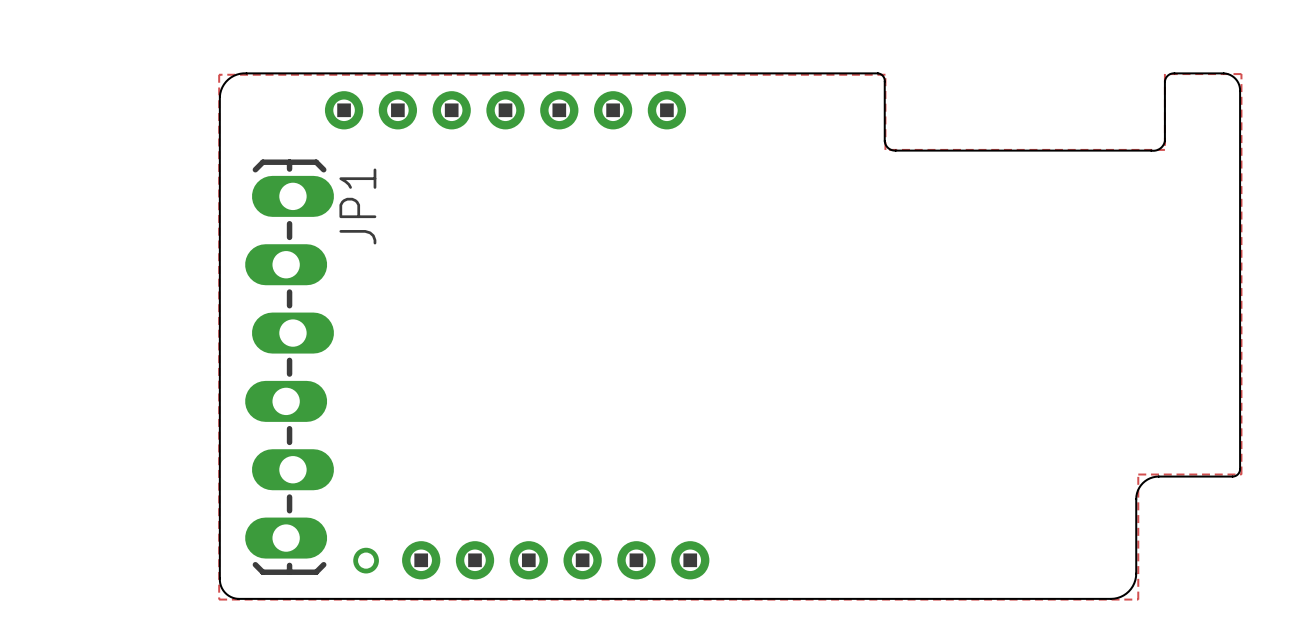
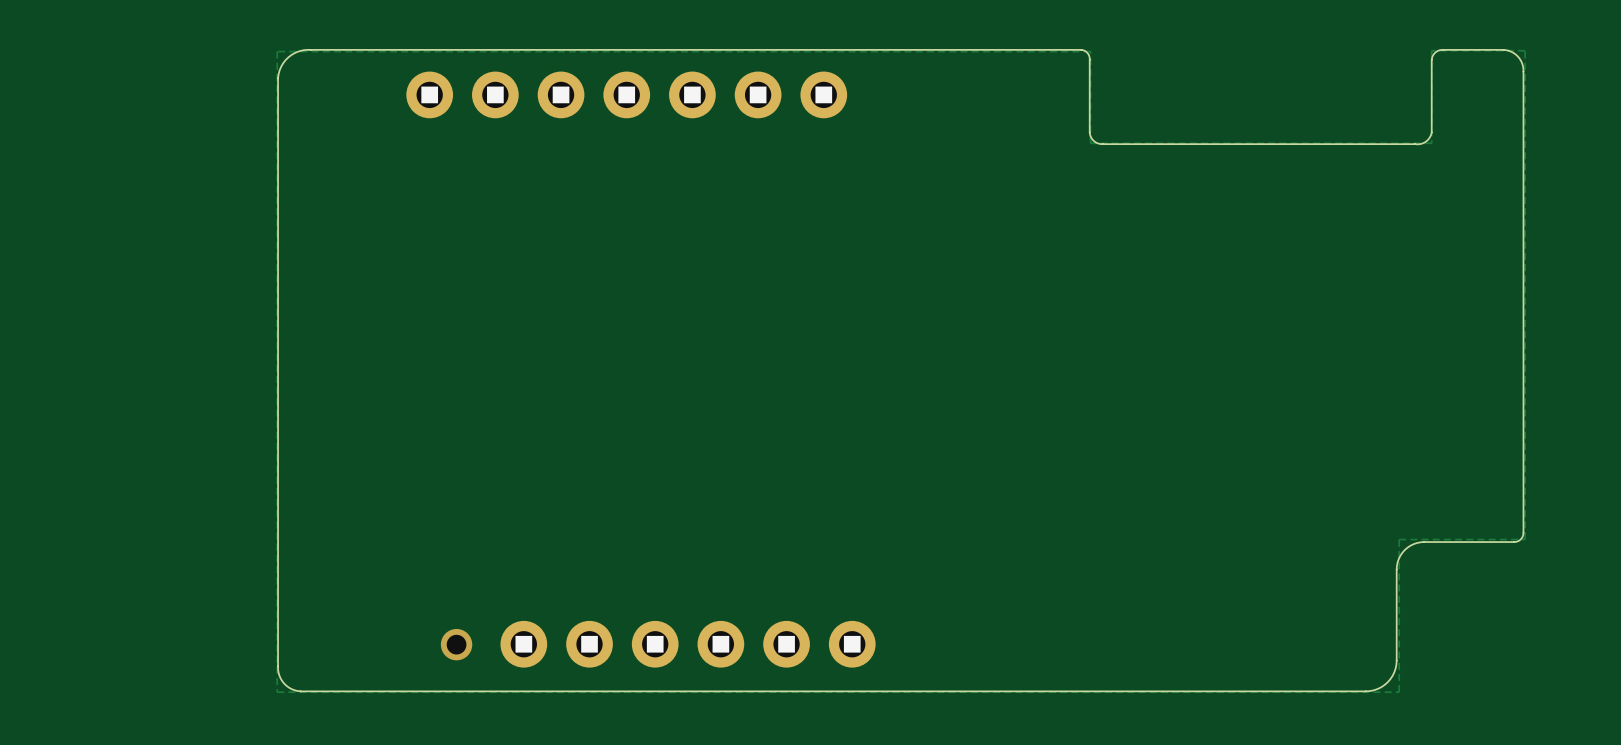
JP1: (289, 367) -> none

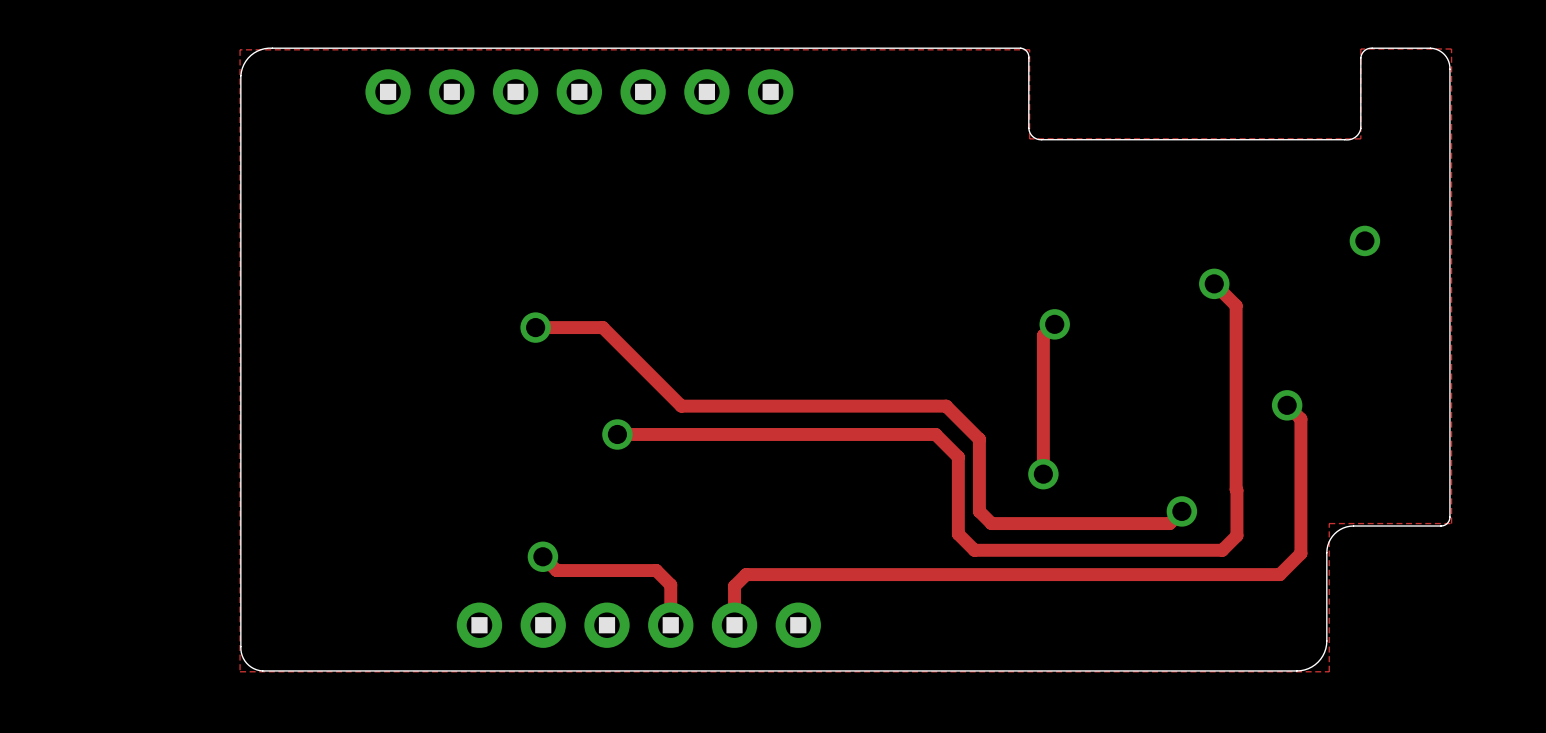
via: none -> (1364, 240)
track: none -> (1214, 283) (1236, 305) (1236, 535) (1222, 550) (974, 550) (958, 534) (958, 457) (935, 434) (617, 434)
via: none -> (1214, 283)
track: none -> (1054, 324) (1043, 335) (1043, 474)
via: none -> (1054, 324)
track: none -> (535, 327) (602, 327) (681, 406) (946, 406) (979, 439) (979, 511) (991, 523) (1169, 523) (1181, 511)
via: none -> (535, 327)
track: none -> (1287, 405) (1300, 419) (1300, 553) (1279, 574) (746, 574) (734, 586) (734, 625)
via: none -> (1287, 405)
via: none -> (617, 434)
via: none -> (1043, 474)
via: none -> (1181, 511)
track: none -> (542, 556) (556, 570) (656, 570) (670, 585) (670, 625)
via: none -> (542, 556)
via: (456, 644) -> none

